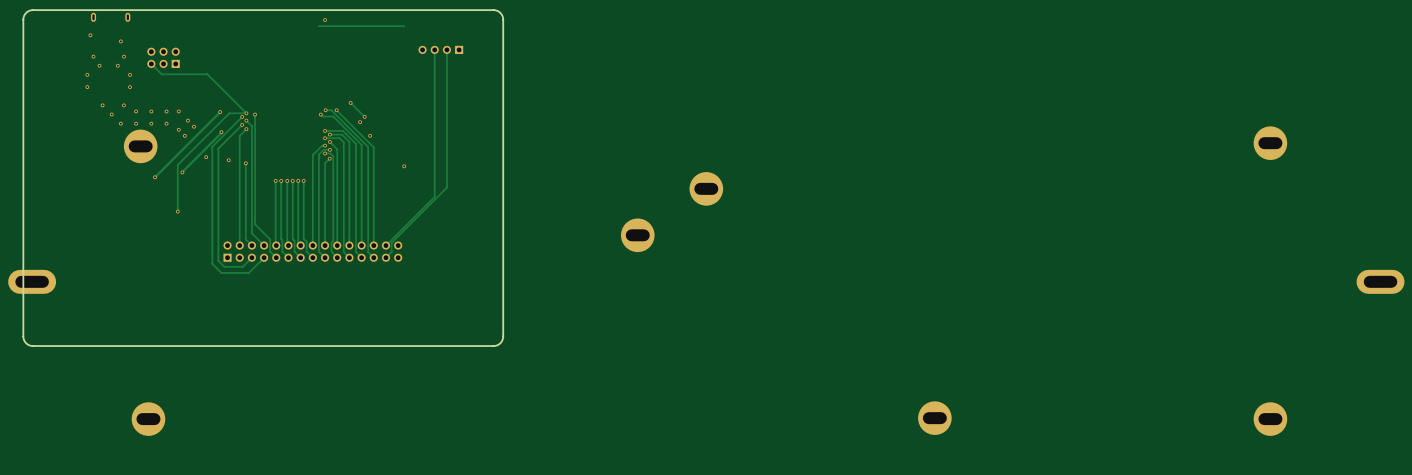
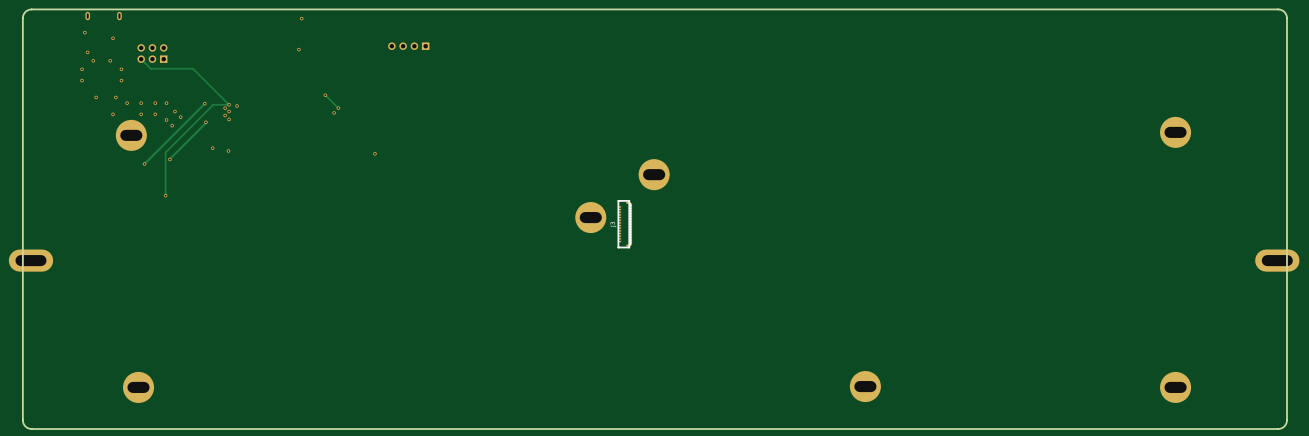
board edge: (493, 10) (500, 12) (503, 19) (503, 336) (499, 344) (493, 346) (32, 346) (26, 343) (23, 336) -> (457, 9) (1282, 10) (1286, 18) (1285, 424) (1278, 429) (30, 428) (25, 426) (22, 420) (22, 311)
track: (318, 26) (404, 26) -> none
track: (434, 49) (434, 196) (385, 245) -> none
track: (446, 49) (446, 187) (391, 242) (391, 252) (385, 257) -> none
via: none -> (298, 49)
via: (123, 56) -> none
track: (325, 110) (331, 110) (368, 146) (368, 252) (373, 257) -> none
via: (325, 110) -> none
track: (336, 110) (373, 147) (373, 245) -> none
via: (336, 110) -> none
via: (111, 114) -> none
track: (255, 114) (255, 224) (270, 239) (270, 251) (276, 257) -> none
track: (320, 114) (322, 116) (333, 116) (361, 144) (361, 245) -> none
via: (320, 114) -> none
track: (242, 116) (212, 146) (212, 263) (221, 272) (248, 272) (264, 257) -> none
track: (246, 120) (251, 126) (251, 233) (264, 245) -> none
via: (136, 123) -> none
track: (242, 124) (218, 148) (218, 260) (224, 266) (242, 266) (251, 257) -> none
track: (246, 129) (239, 135) (239, 245) -> none
track: (325, 130) (343, 130) (355, 143) (355, 252) (361, 257) -> none
via: (325, 130) -> none
track: (329, 134) (342, 134) (349, 141) (349, 245) -> none
via: (329, 134) -> none
via: (370, 135) -> none
via: (325, 138) -> none
track: (327, 138) (339, 138) (343, 142) (343, 252) (349, 257) -> none
track: (329, 141) (337, 149) (337, 245) -> none
via: (329, 141) -> none
track: (325, 145) (322, 145) (312, 155) (312, 245) -> none
via: (325, 145) -> none
track: (329, 149) (323, 149) (318, 154) (318, 251) (325, 257) -> none
via: (329, 149) -> none
track: (325, 153) (330, 153) (333, 156) (331, 252) (337, 257) -> none
via: (325, 153) -> none
via: (206, 157) -> none
track: (329, 158) (325, 163) (325, 245) -> none
via: (329, 158) -> none
track: (245, 163) (245, 239) (251, 245) -> none
track: (275, 180) (276, 245) -> none
via: (275, 180) -> none
track: (281, 180) (281, 238) (282, 251) (288, 257) -> none
via: (281, 180) -> none
track: (287, 180) (288, 245) -> none
via: (287, 180) -> none
track: (292, 180) (292, 238) (294, 240) (294, 251) (300, 257) -> none
via: (292, 180) -> none
track: (298, 180) (298, 243) (300, 245) (300, 243) -> none
via: (298, 180) -> none
track: (303, 180) (303, 238) (306, 241) (306, 251) (312, 257) -> none
via: (303, 180) -> none
part: none -> (625, 224)
part: (312, 251) -> none

